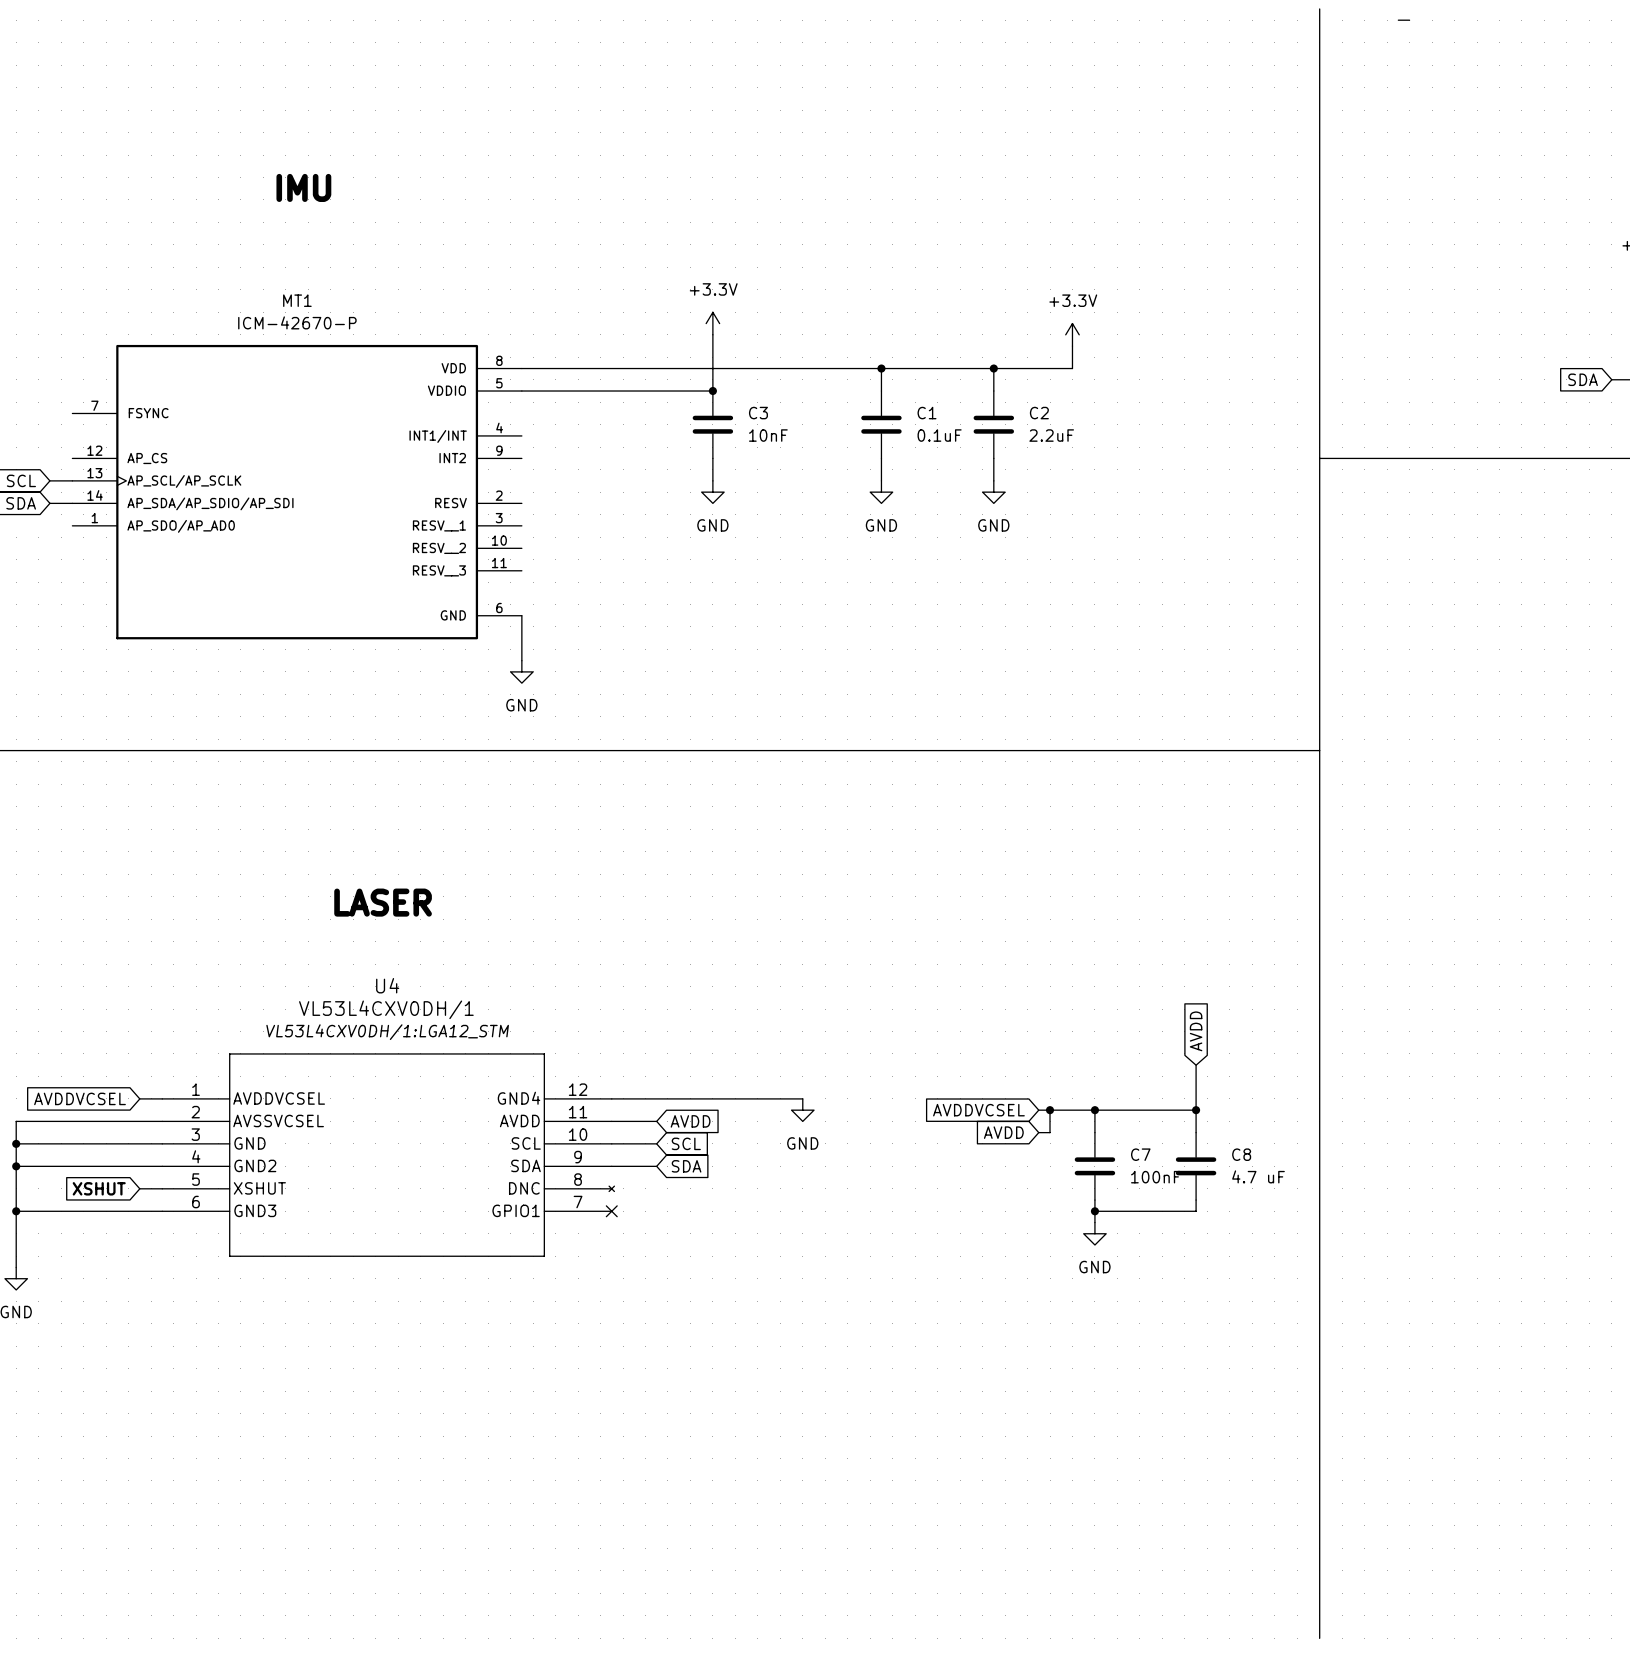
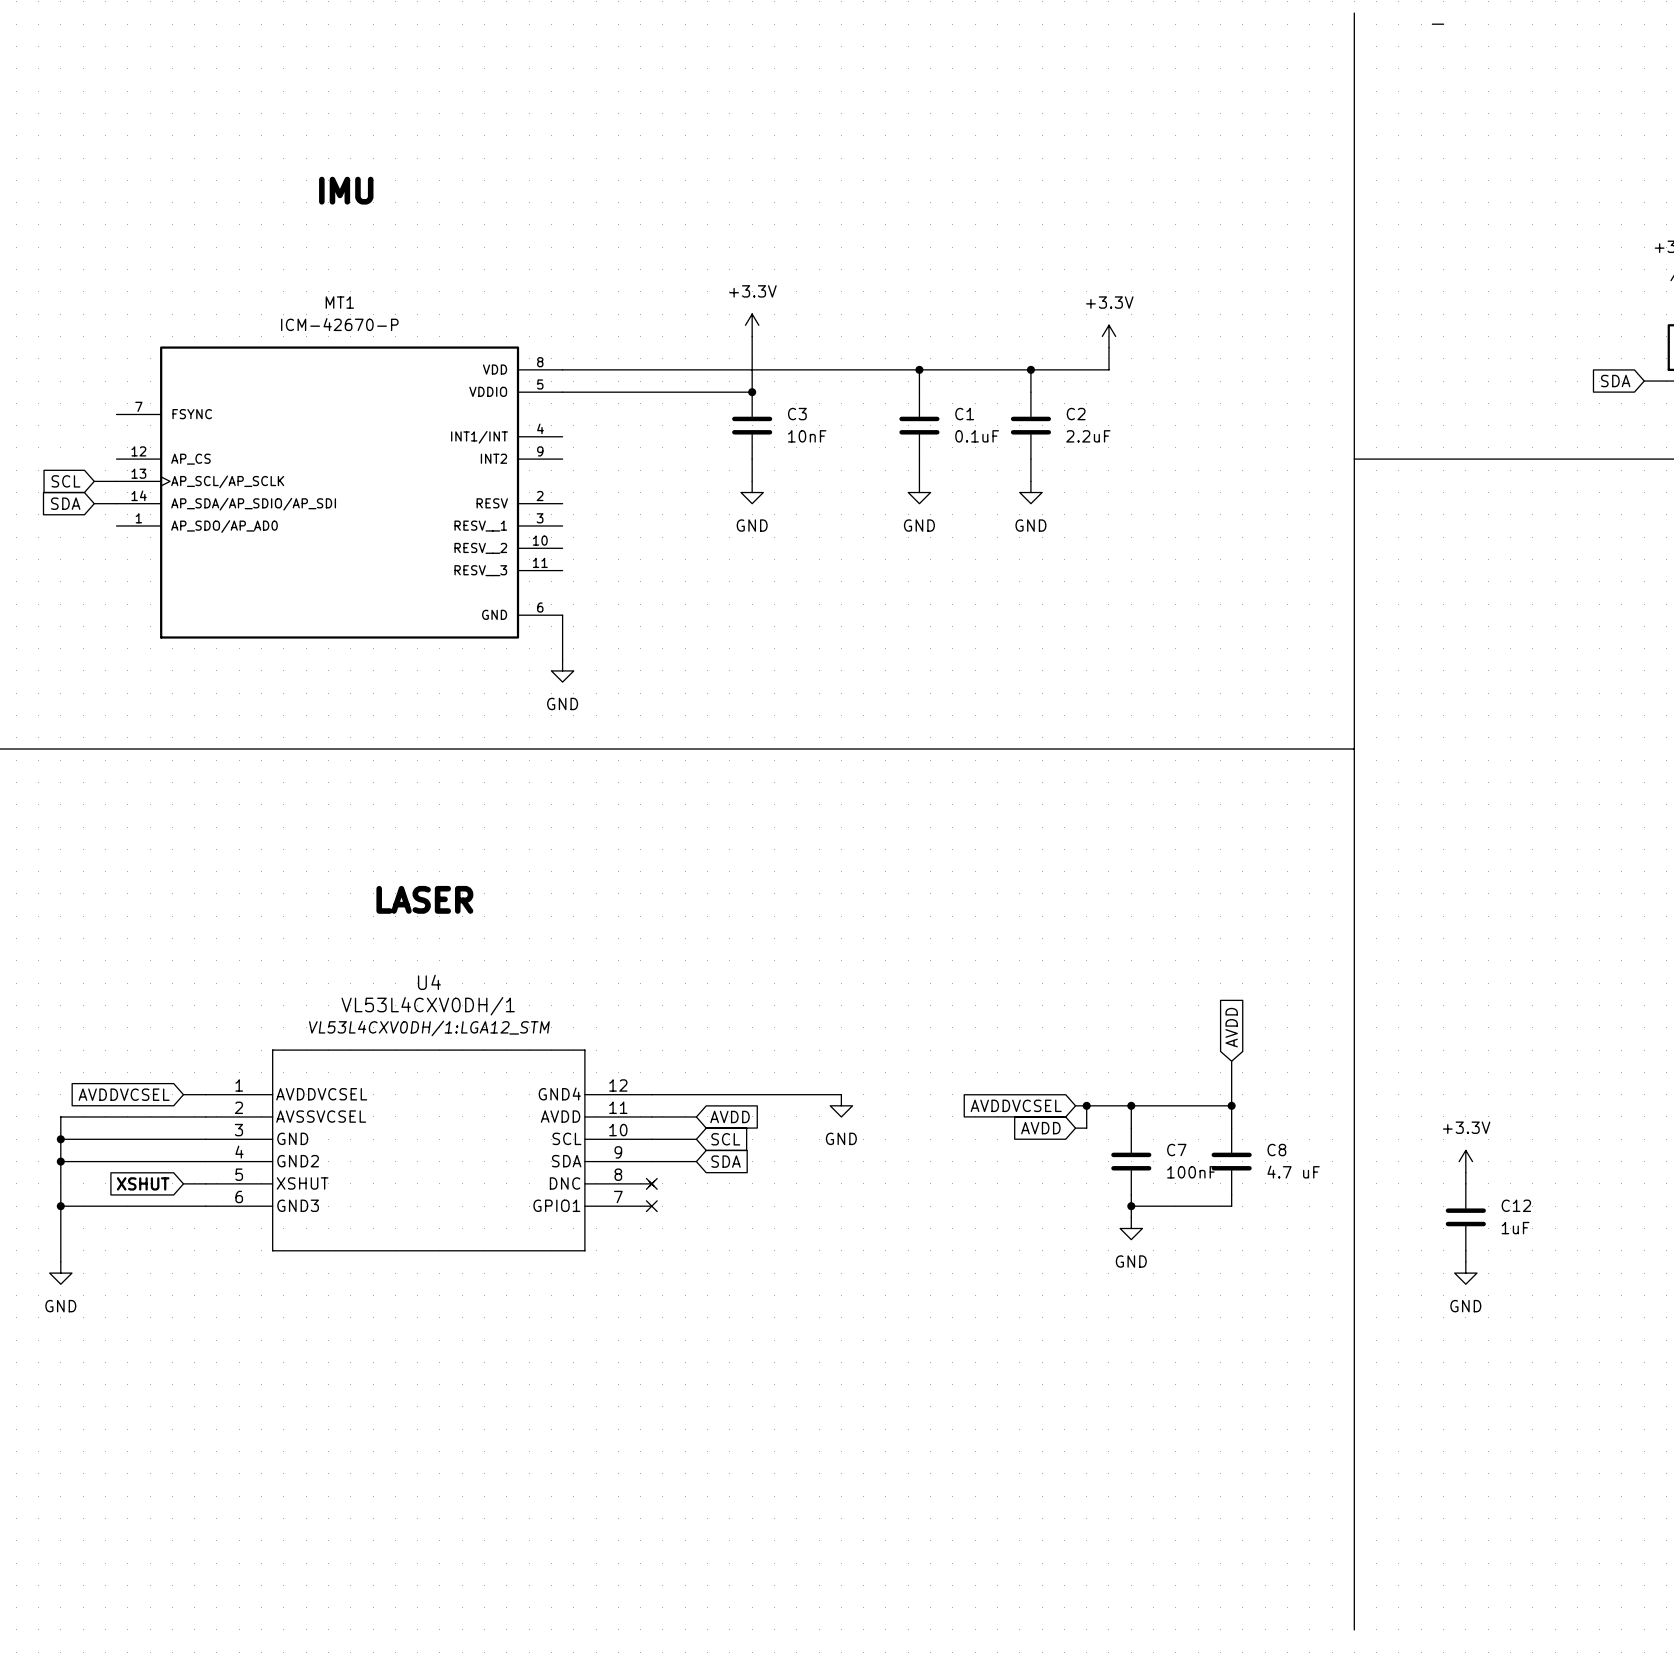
power symbol: none -> +3.3V (1465, 1161)
wire: none -> (1465, 1172) (1465, 1183)
no-connect mark: none -> (651, 1183)
C12: none -> 1uF (1465, 1217)
wire: none -> (1465, 1250) (1465, 1261)
power symbol: none -> GND (1465, 1273)

